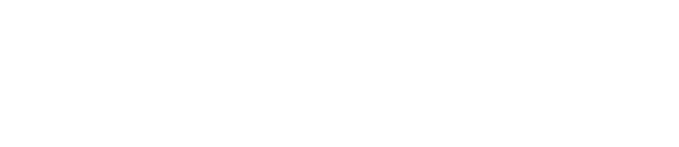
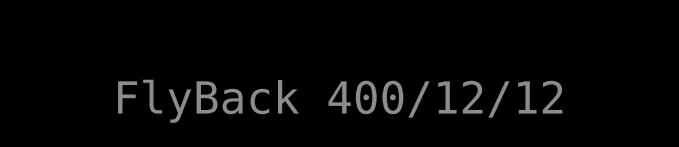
text: none -> FlyBack 400/12/12 (340, 101)

